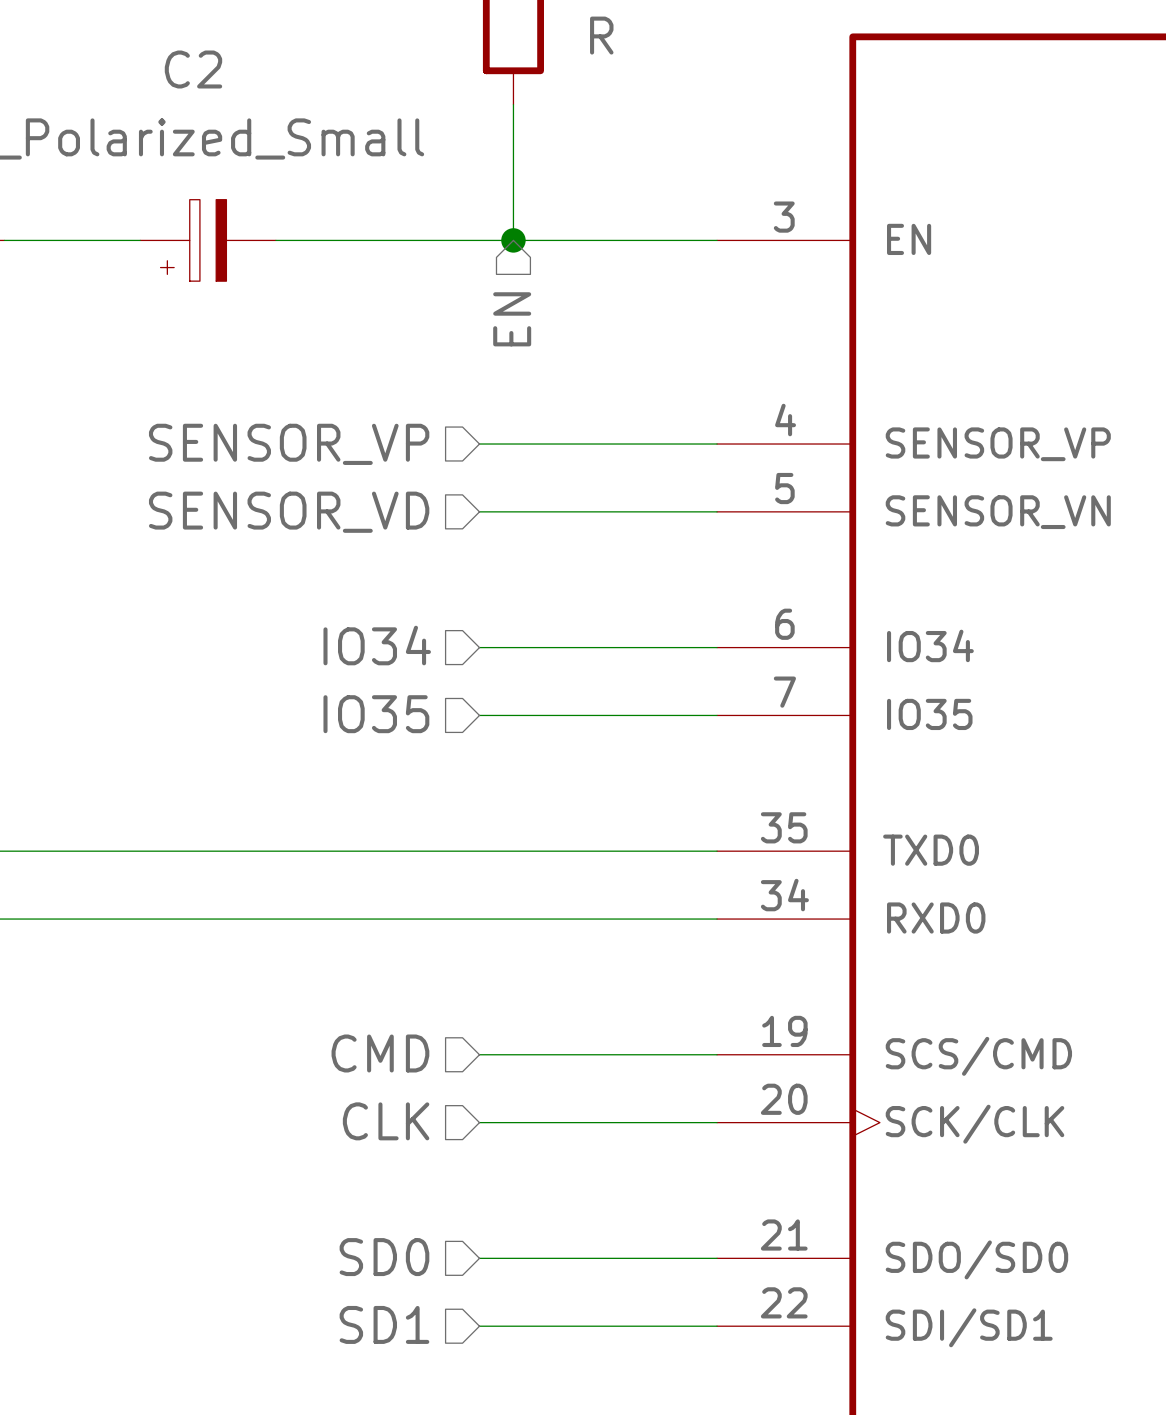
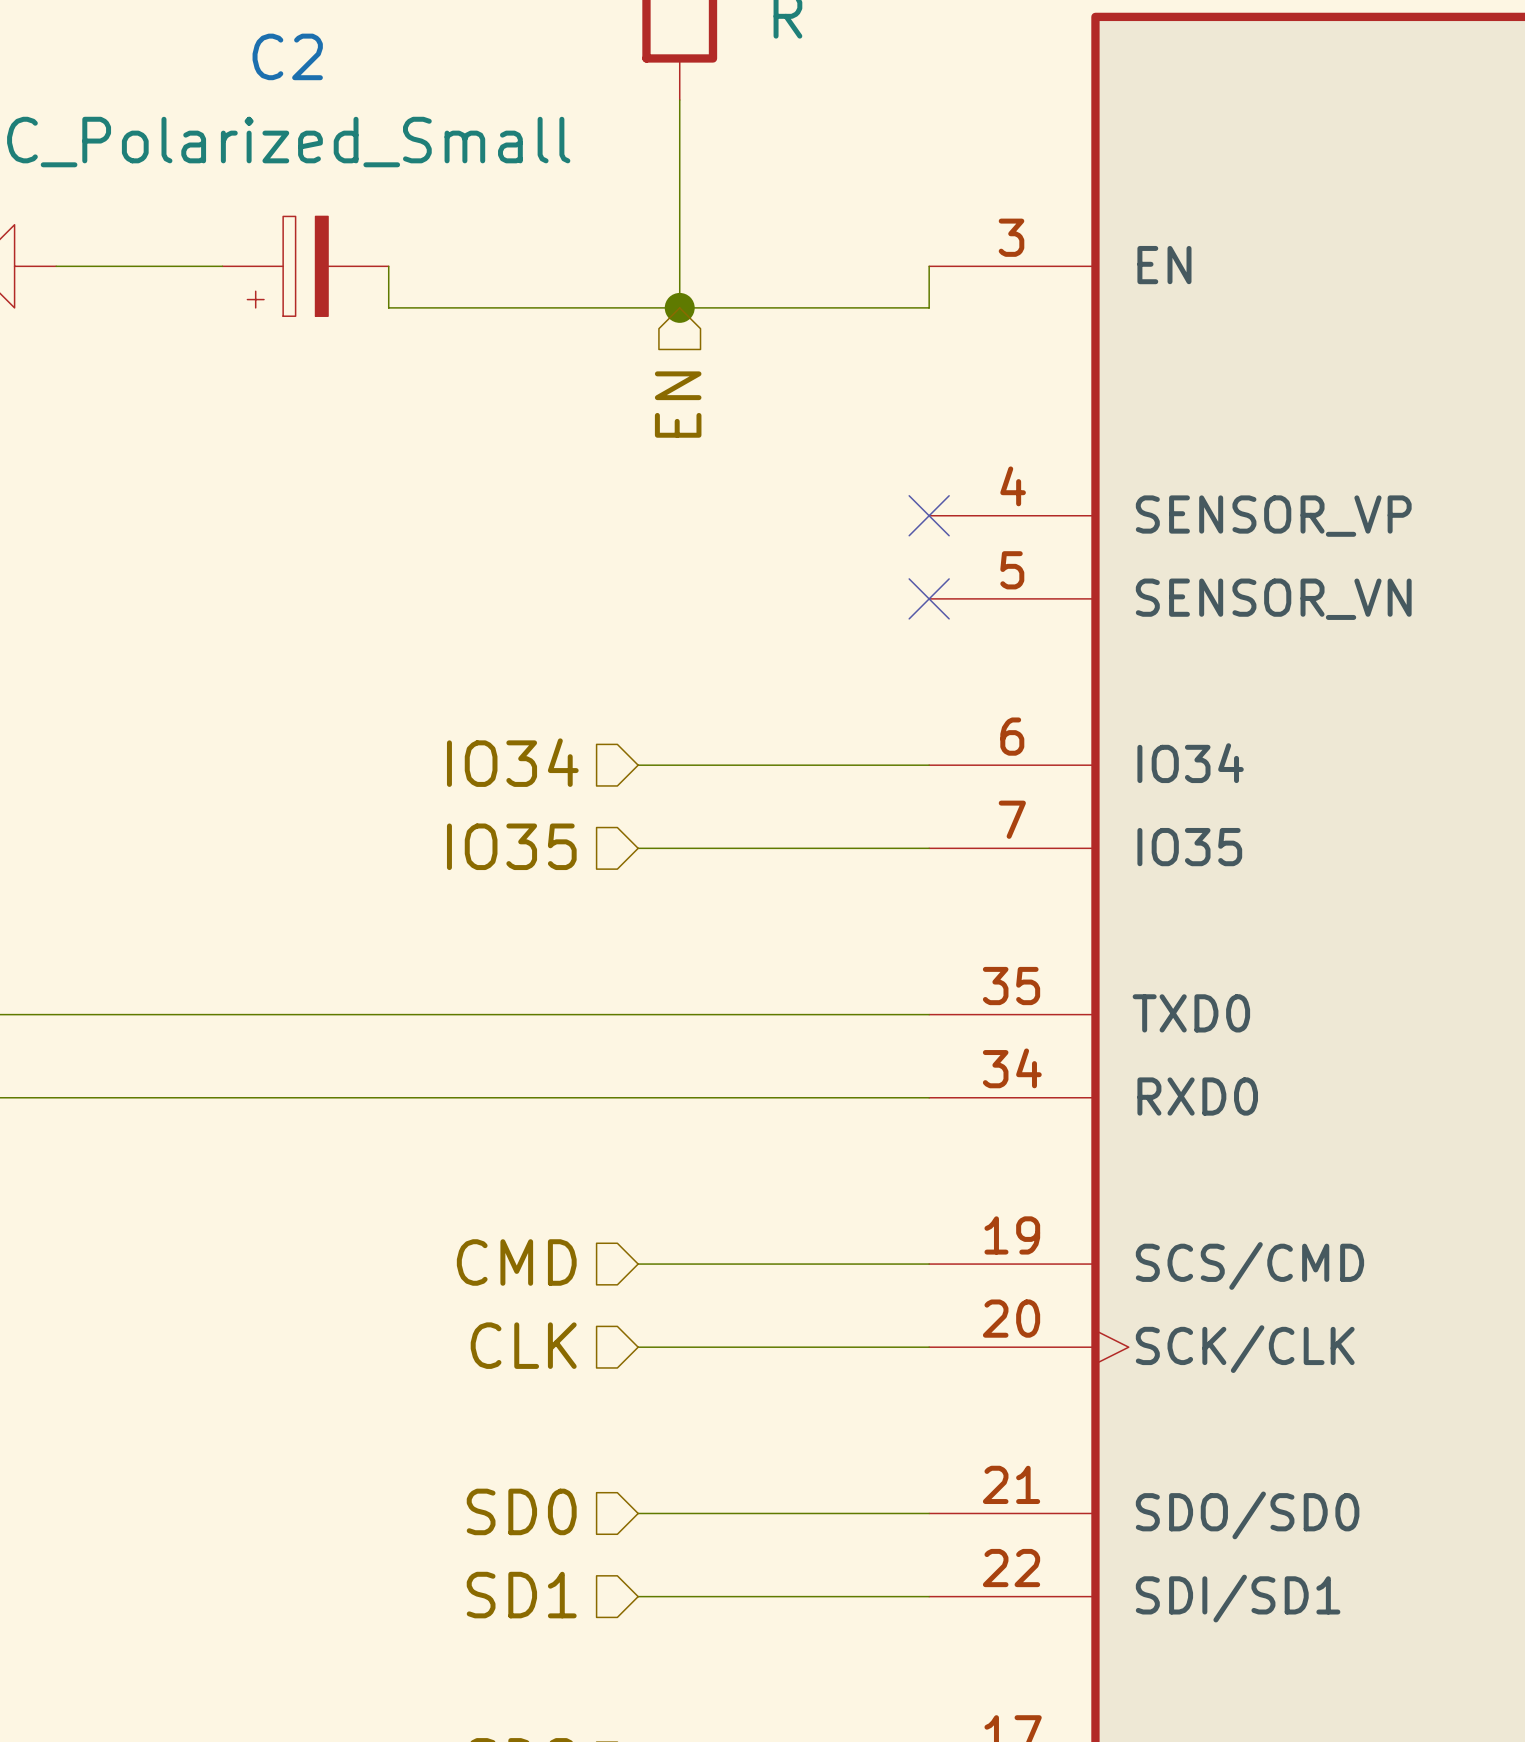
wire: (275, 240) (717, 240) -> (388, 266) (388, 307) (929, 307) (929, 266)
wire: none -> (679, 266) (679, 307)
junction position: (513, 240) -> (679, 307)
hierarchical label position: EN (512, 319) -> EN (678, 404)
hierarchical label: SENSOR_VP (289, 444) -> none
wire: (479, 444) (717, 444) -> none
no-connect mark: none -> (929, 515)
wire: (479, 511) (717, 511) -> none
no-connect mark: none -> (929, 598)
hierarchical label: SENSOR_VD (289, 512) -> none

